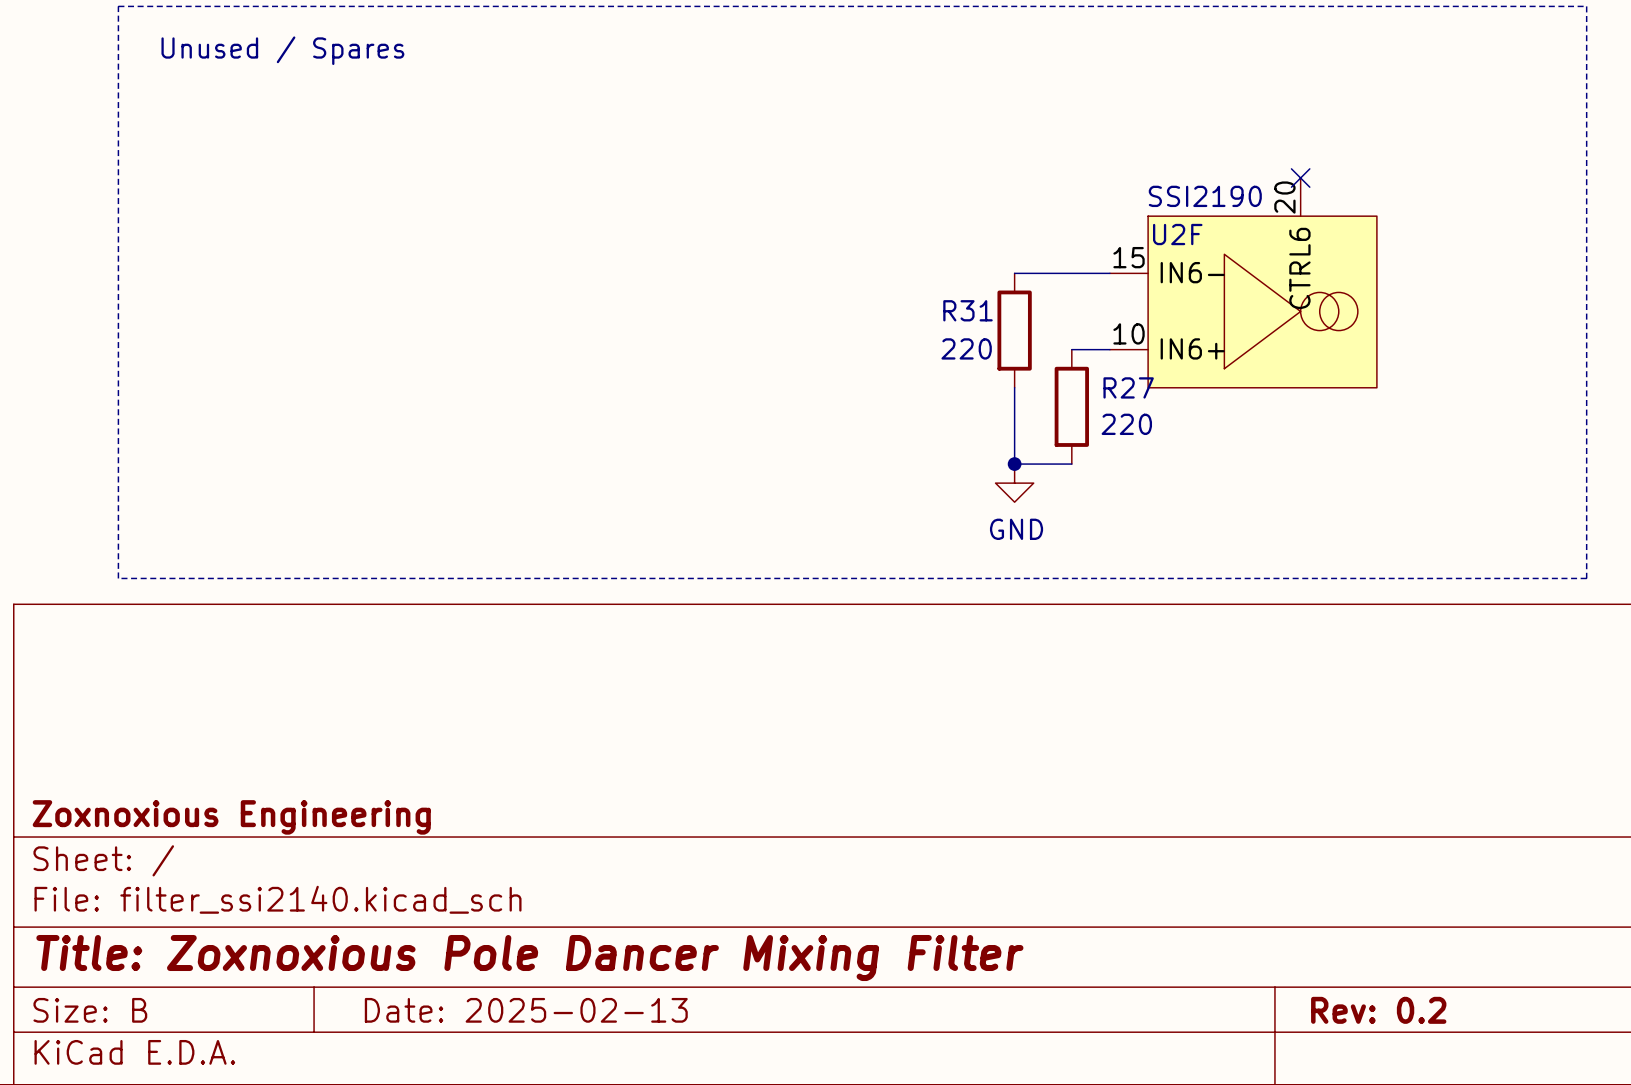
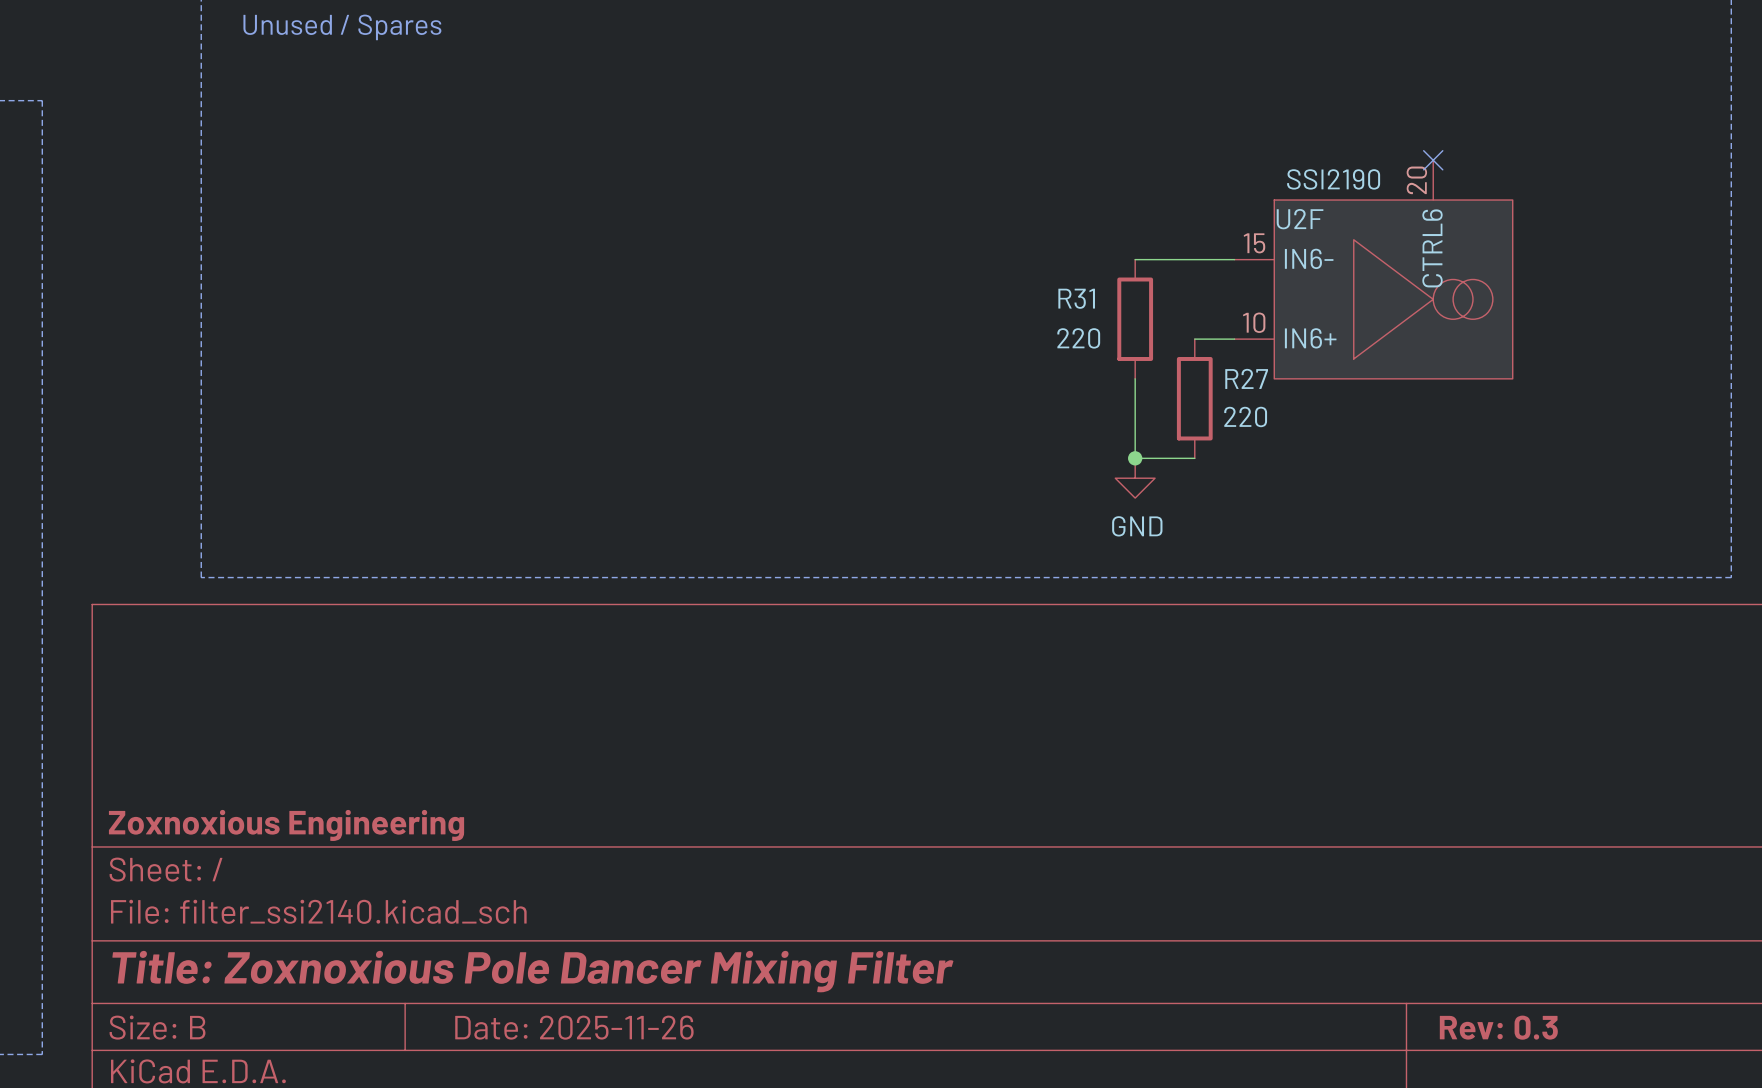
title block: Date: 2025-02-13 (526, 1010) -> Date: 2025-11-26 (574, 1027)
title block: Rev: 0.2 (1378, 1010) -> Rev: 0.3 (1498, 1027)

